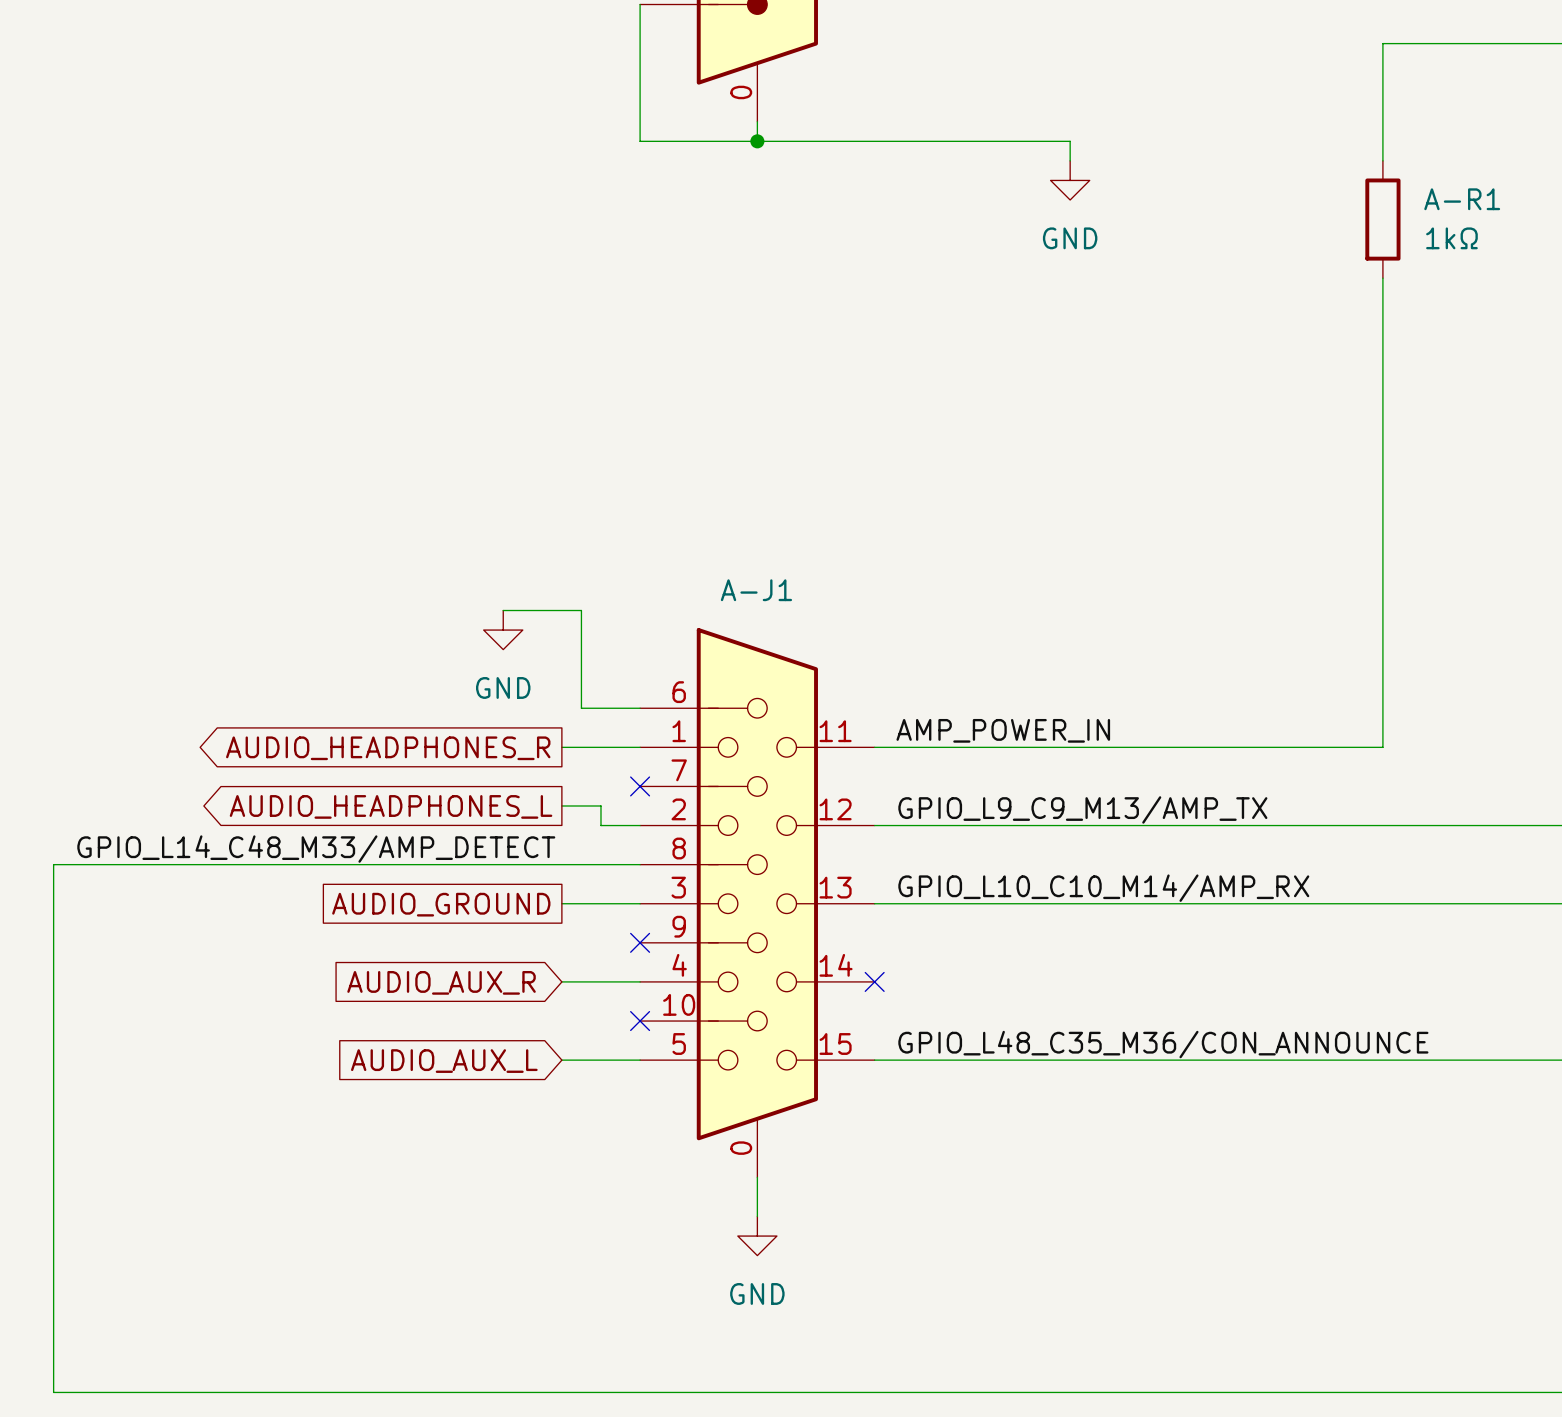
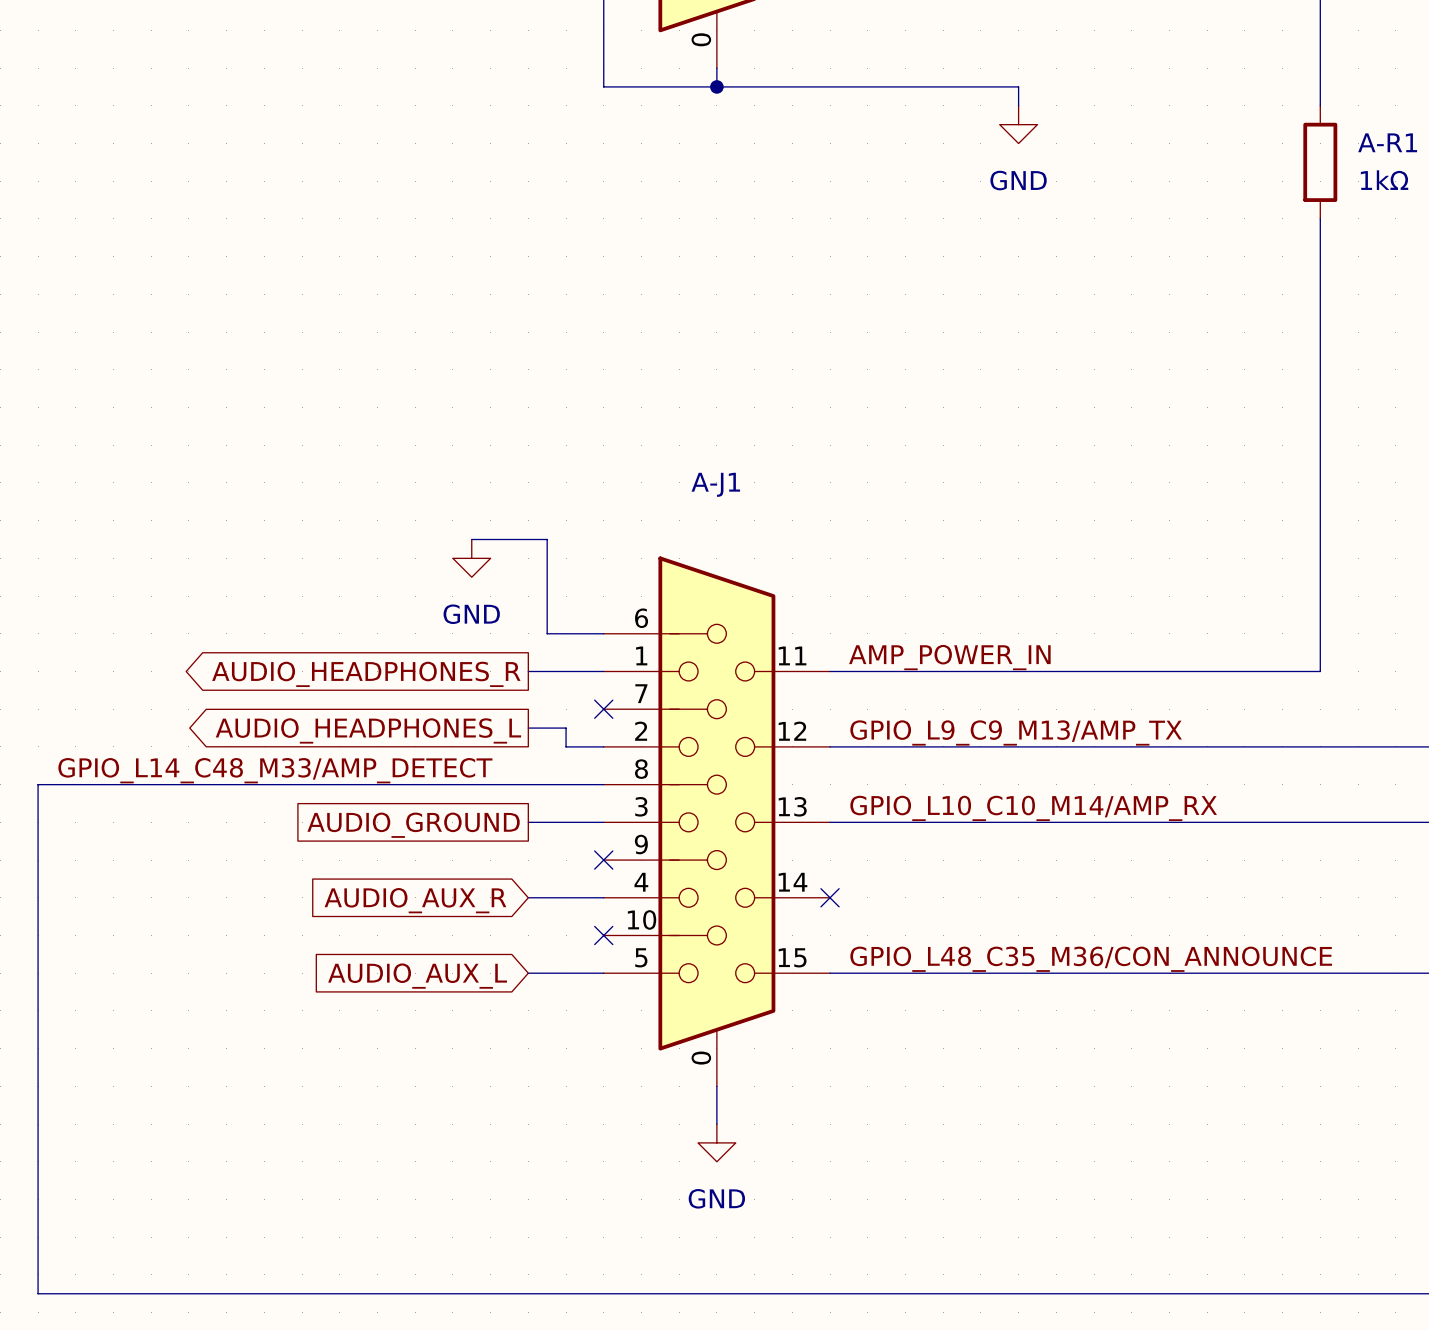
A-J1 name position: A-J1 (756, 590) -> A-J1 (715, 484)

